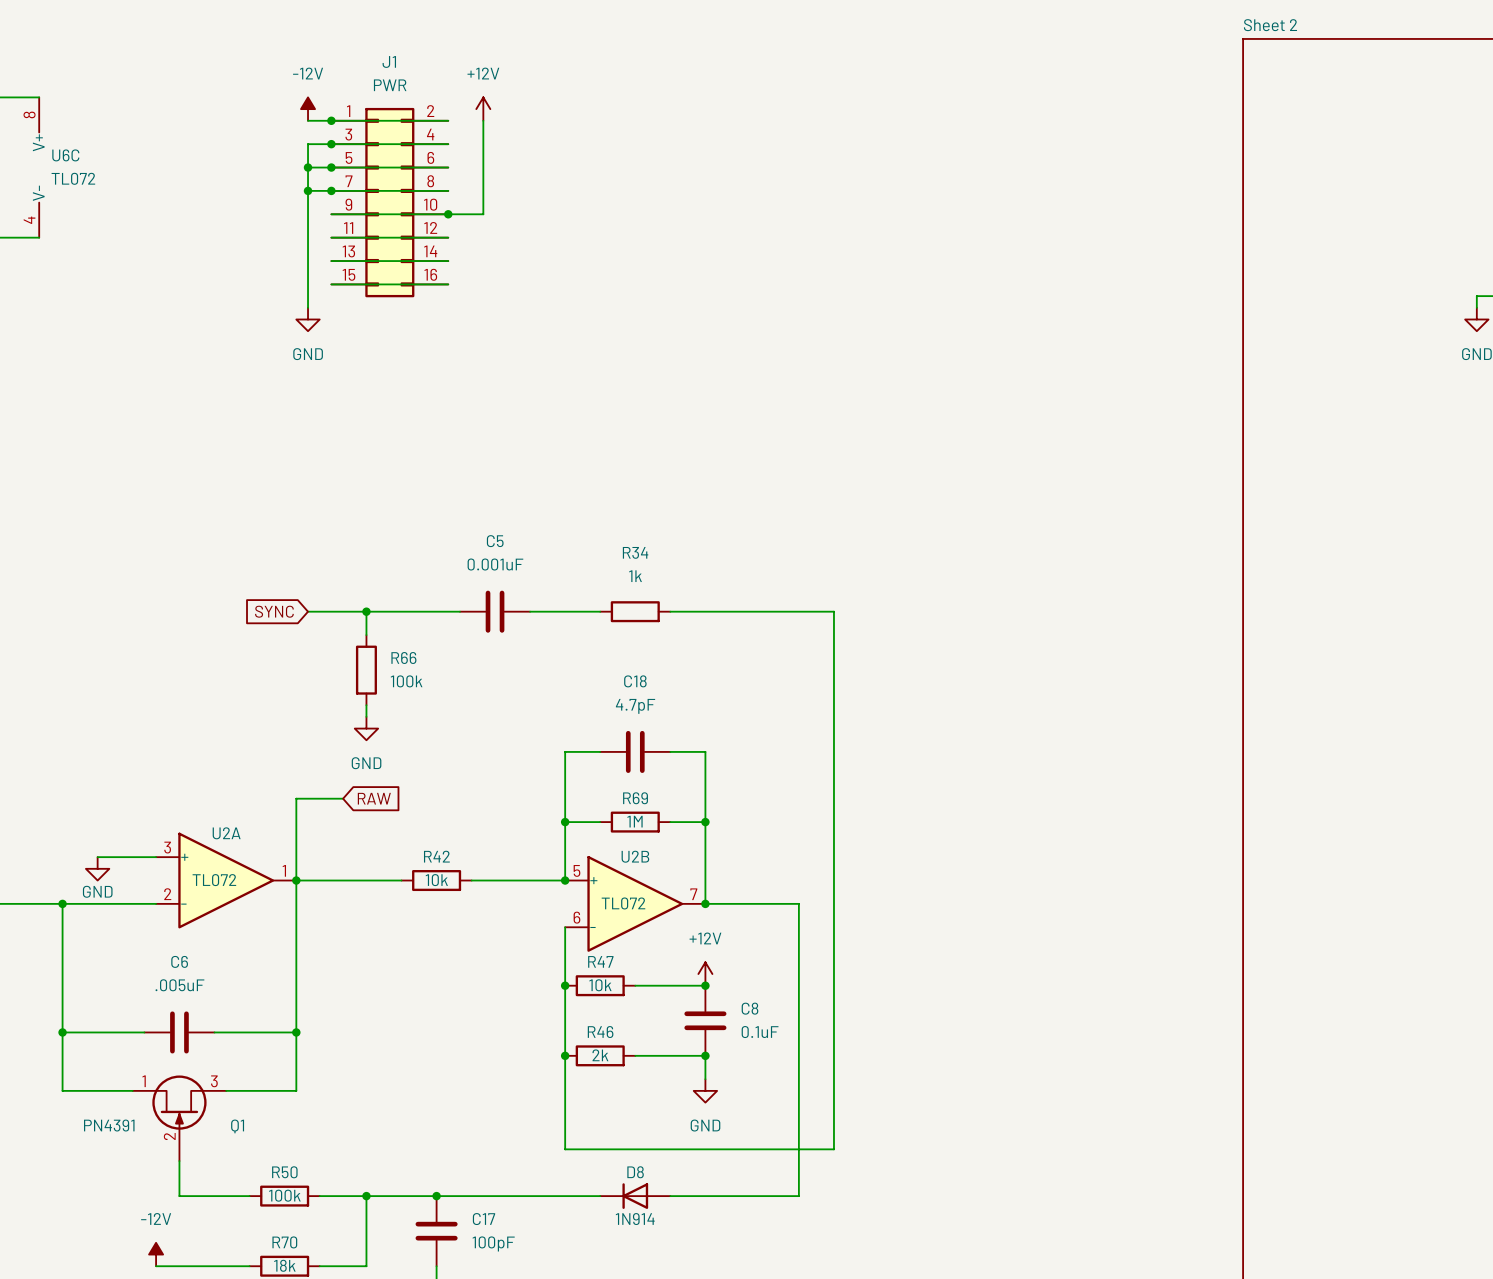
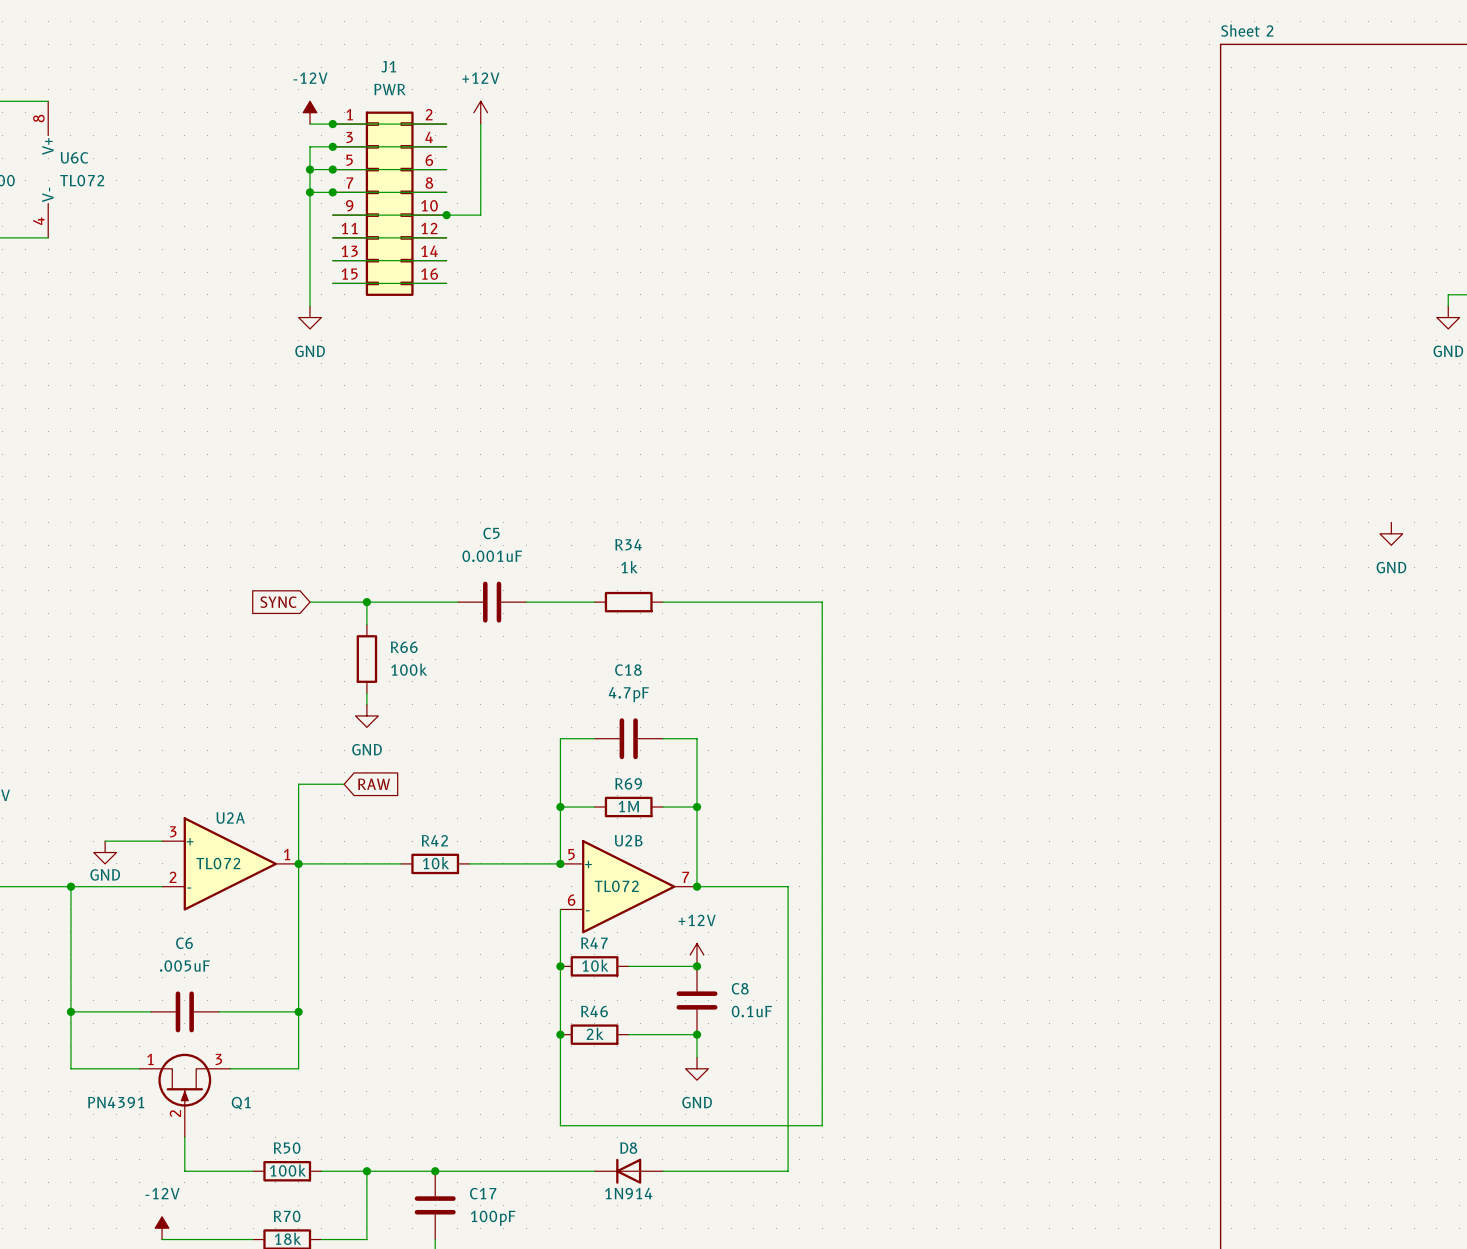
power symbol: none -> GND (1391, 533)

